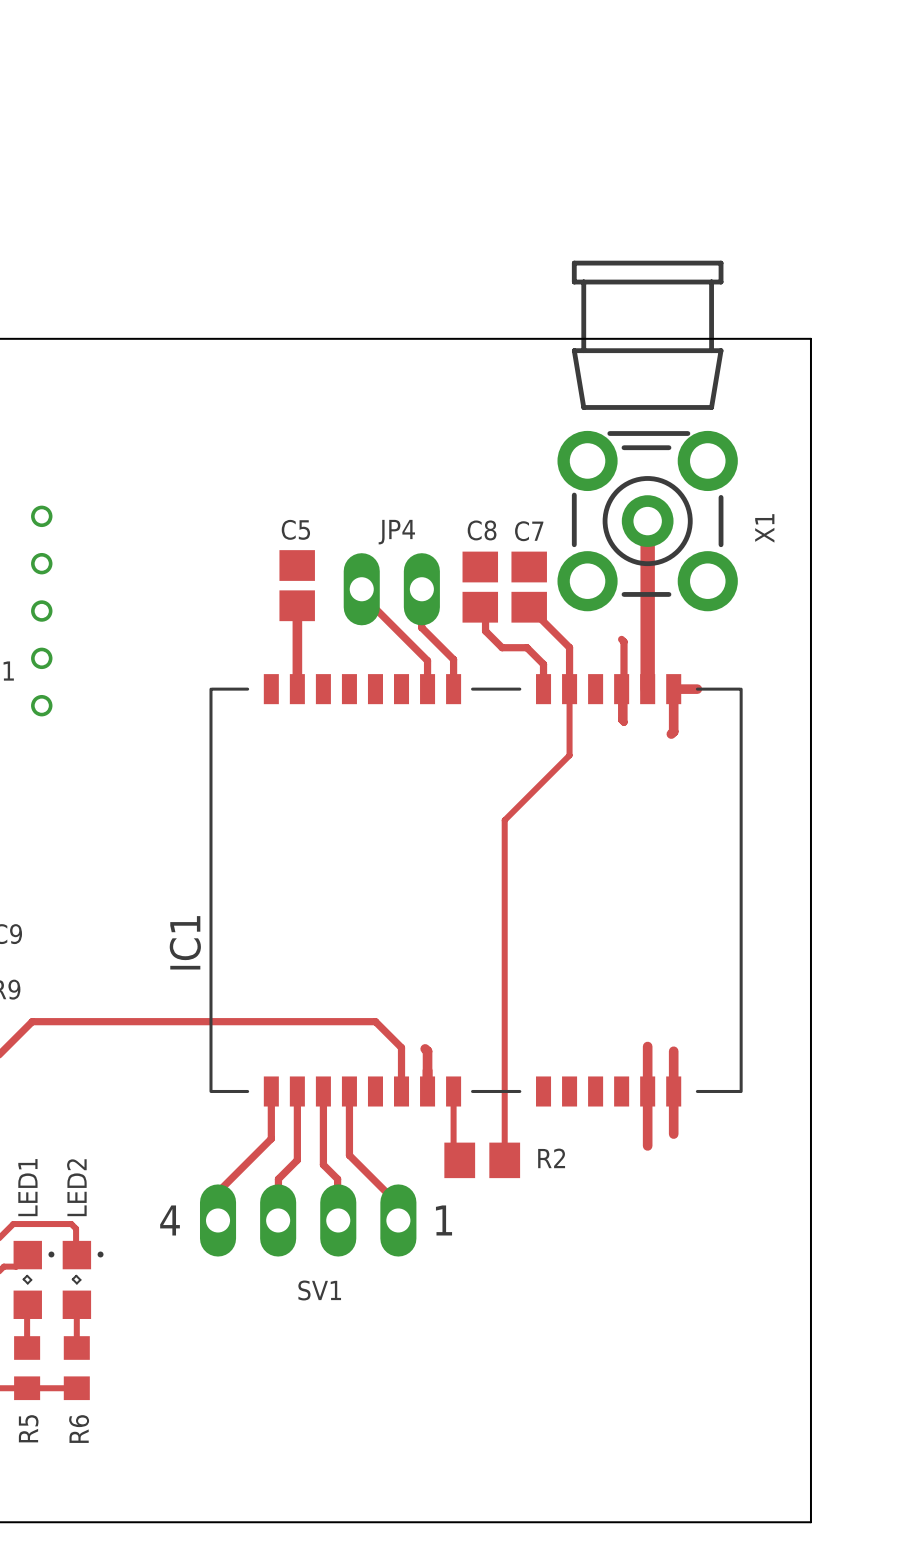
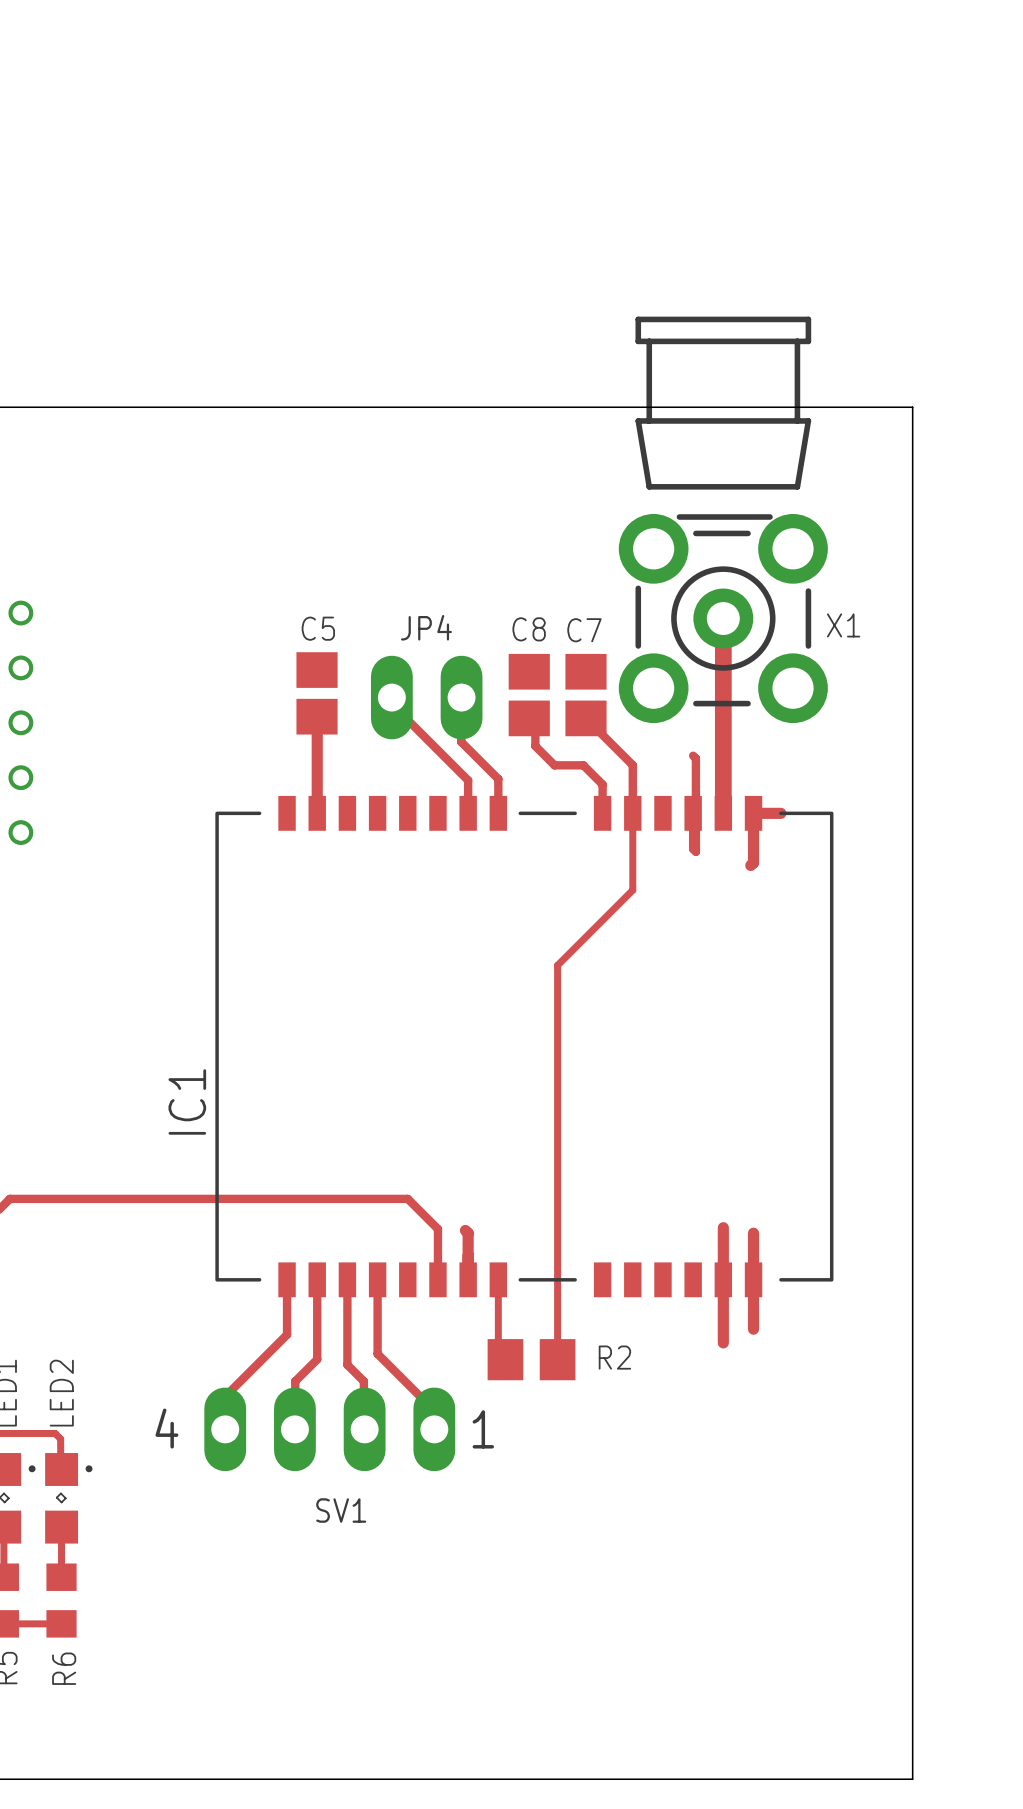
X1 name rotation: 0° (764, 528) -> 90° clockwise (843, 625)

